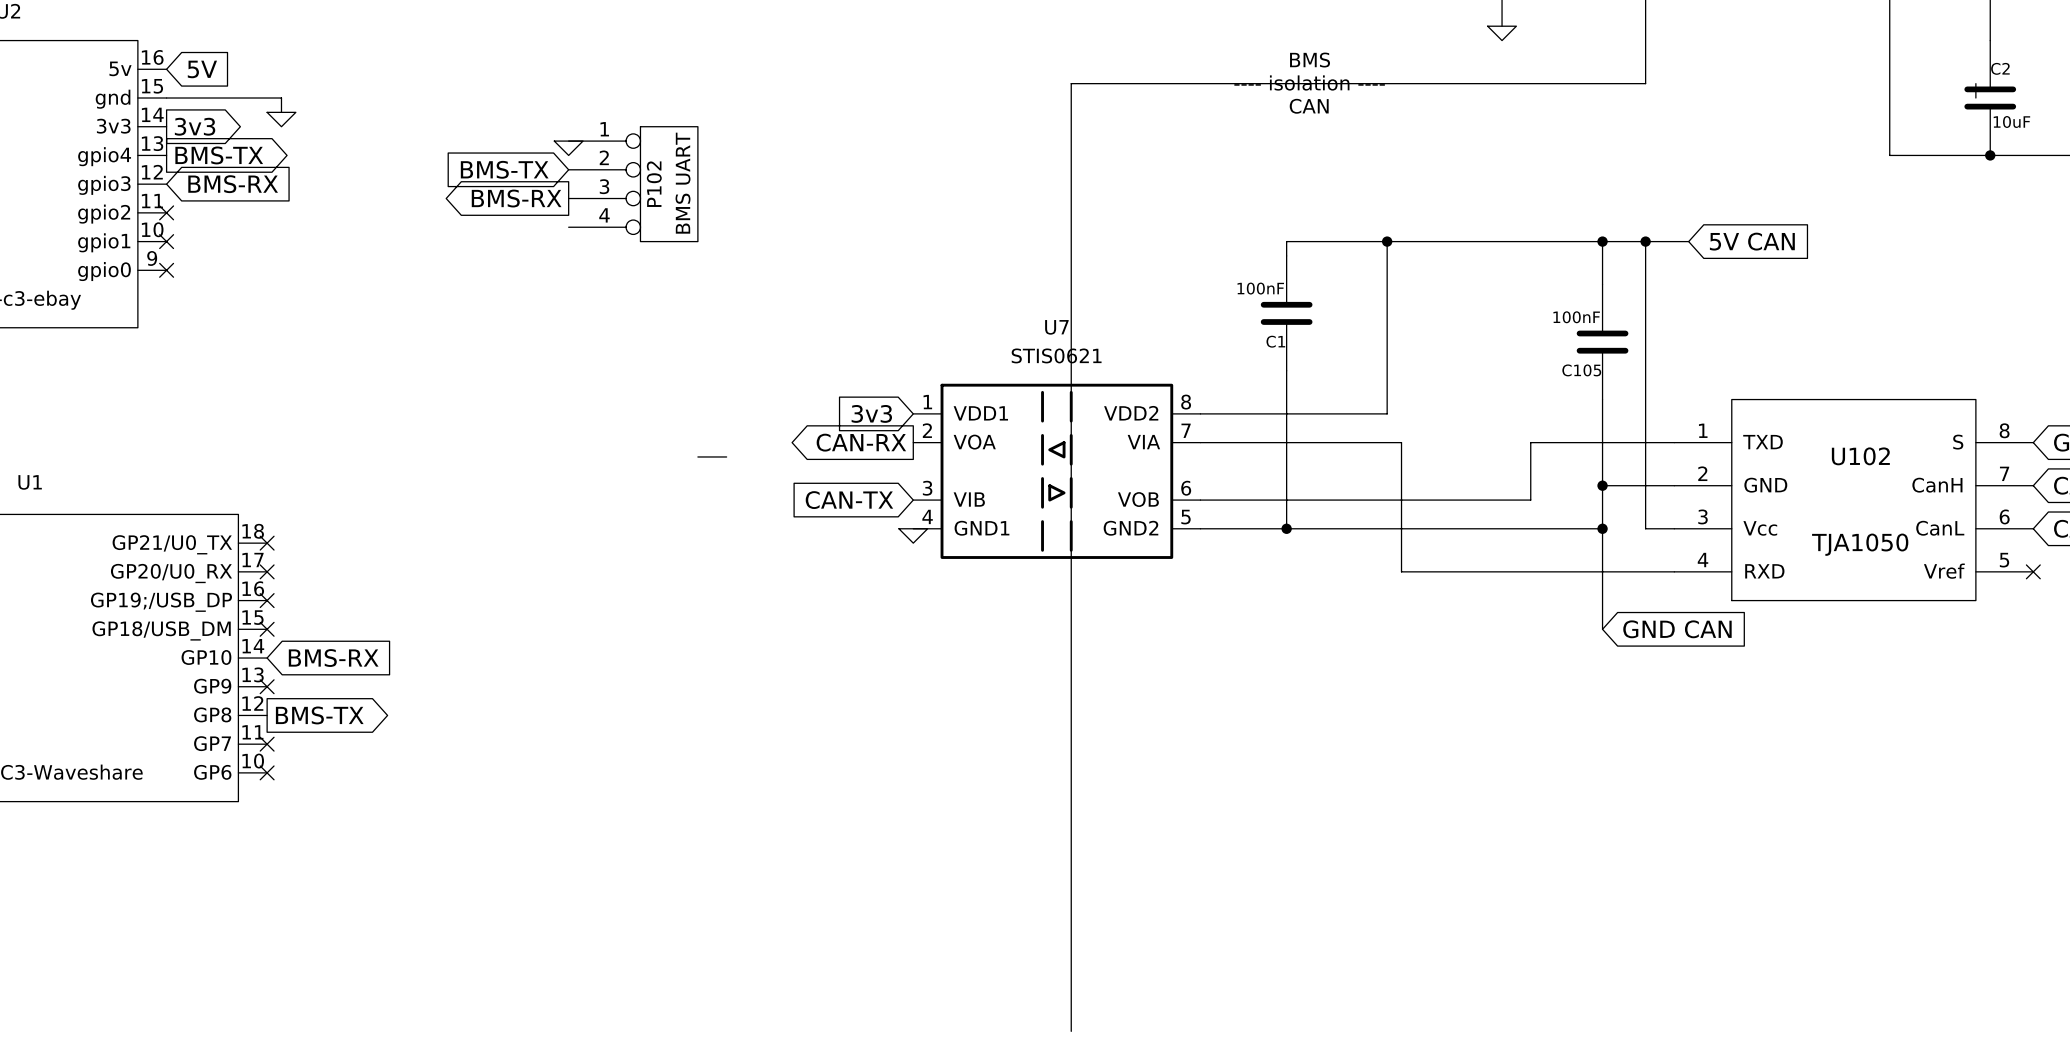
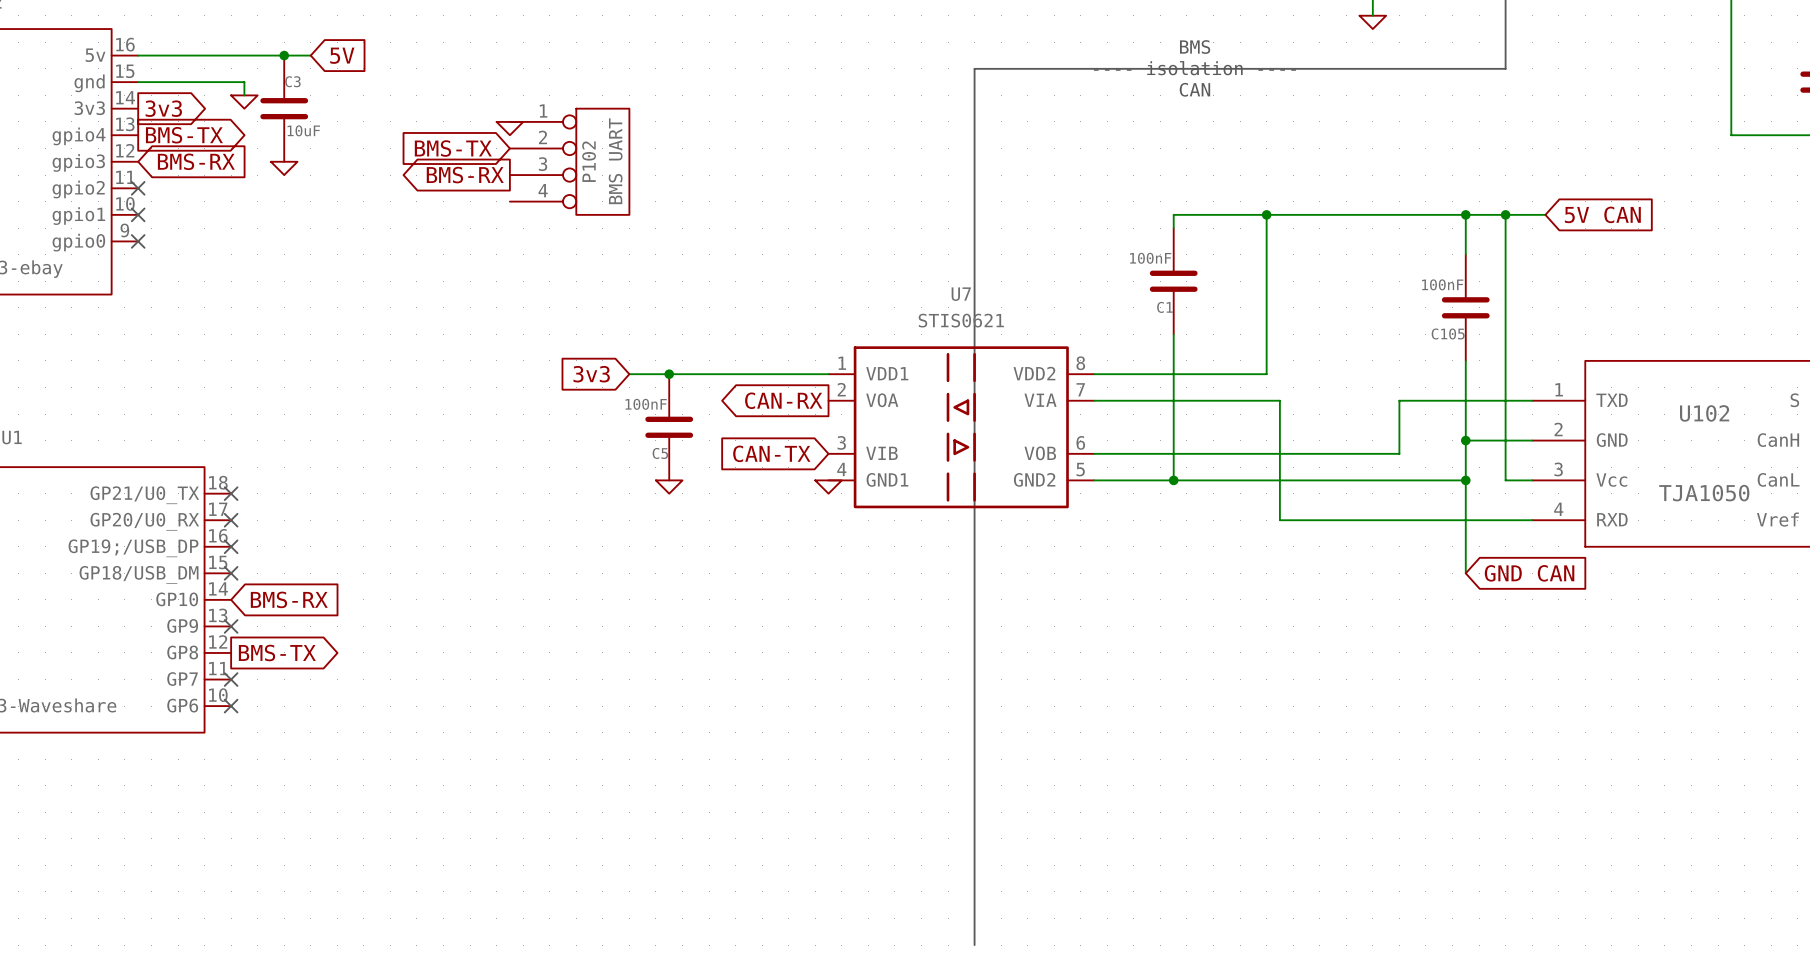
wire: none -> (138, 55) (310, 55)
global label position: 5V (202, 69) -> 5V (342, 55)
junction: none -> (284, 55)
C3: none -> 10uF (284, 108)
power symbol: none -> (284, 168)
wire: none -> (629, 374) (828, 374)
junction: none -> (669, 374)
global label position: 3v3 (871, 413) -> 3v3 (591, 374)
line: (697, 456) (726, 456) -> none
C5: none -> 100nF (669, 427)
power symbol: none -> (669, 487)

